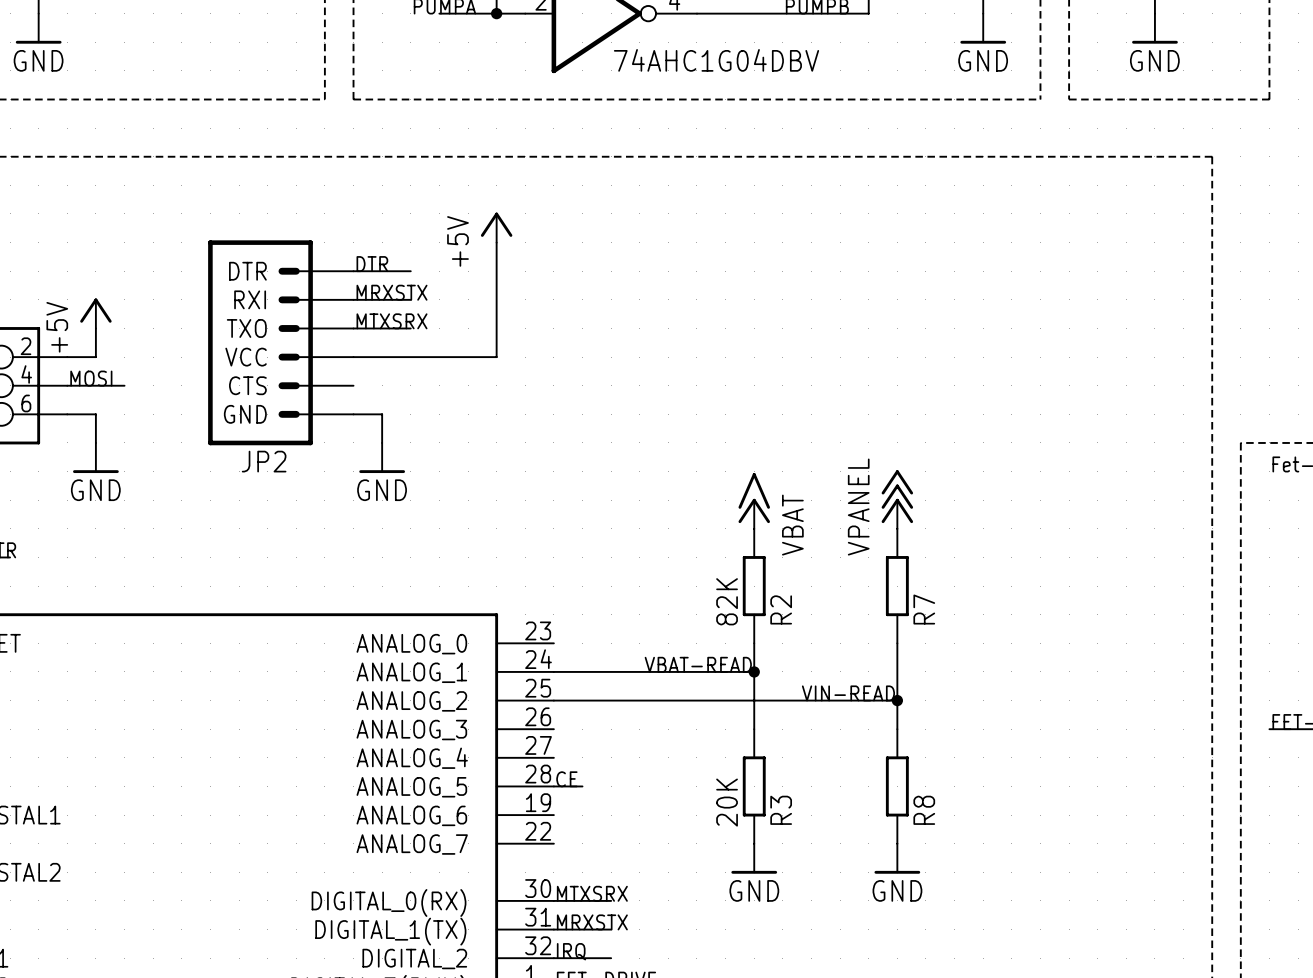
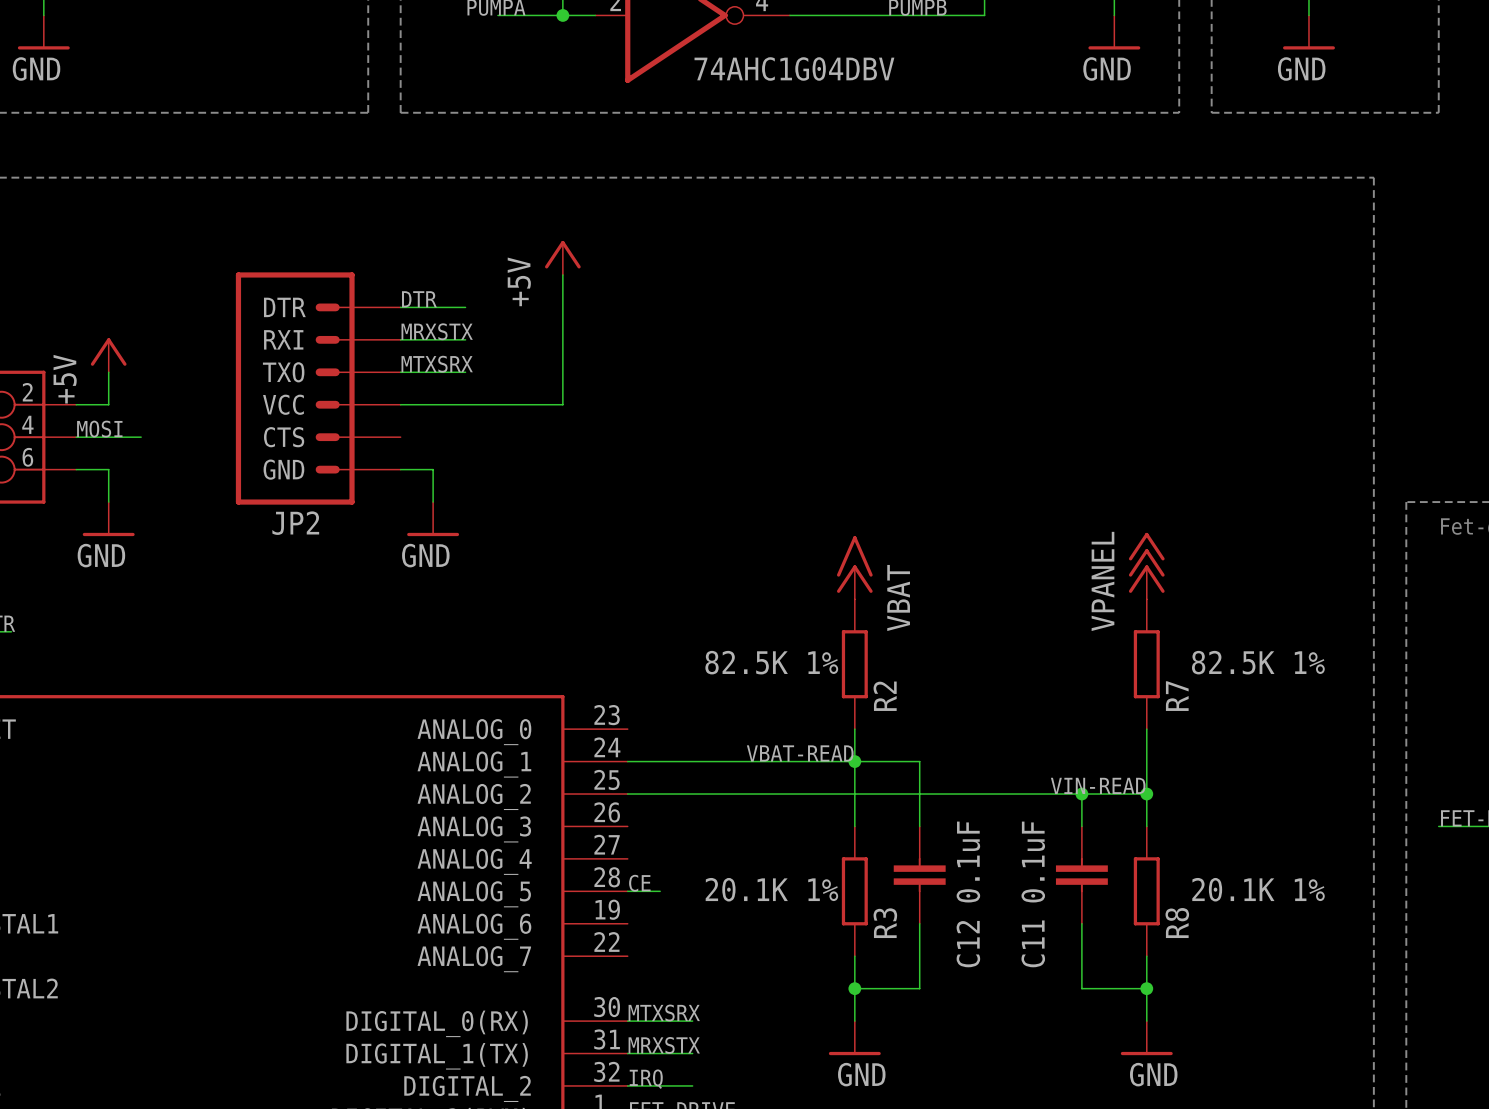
power symbol position: VPANEL (897, 499) -> VPANEL (1146, 566)
R7 value: none -> 82.5K 1% (1258, 662)
R7 position: (897, 586) -> (1146, 664)
R2 value: 82K (727, 601) -> 82.5K 1% (771, 662)
wire: (897, 643) (897, 729) -> (1146, 729) (1146, 826)
wire: none -> (854, 761) (919, 761) (919, 826)
label position: VIN-READ (848, 693) -> VIN-READ (1098, 785)
wire: none -> (1017, 794) (1146, 794)
junction: (897, 700) -> none
wire: none -> (1081, 794) (1081, 826)
junction: none -> (1081, 794)
junction: none -> (1146, 794)
C12: none -> 0.1uF (919, 875)
C11: none -> 0.1uF (1081, 875)
R8 value: none -> 20.1K 1% (1258, 889)
R8 position: (897, 786) -> (1146, 891)
R3 value: 20K (727, 802) -> 20.1K 1% (771, 889)
wire: none -> (919, 923) (919, 988) (854, 988)
wire: none -> (1081, 923) (1081, 988) (1146, 988)
wire: none -> (1146, 956) (1146, 1021)
power symbol position: GND (754, 858) -> GND (854, 1038)
power symbol: GND (897, 858) -> none
junction: none -> (854, 988)
junction: none -> (1146, 988)
power symbol: none -> GND (1146, 1038)

